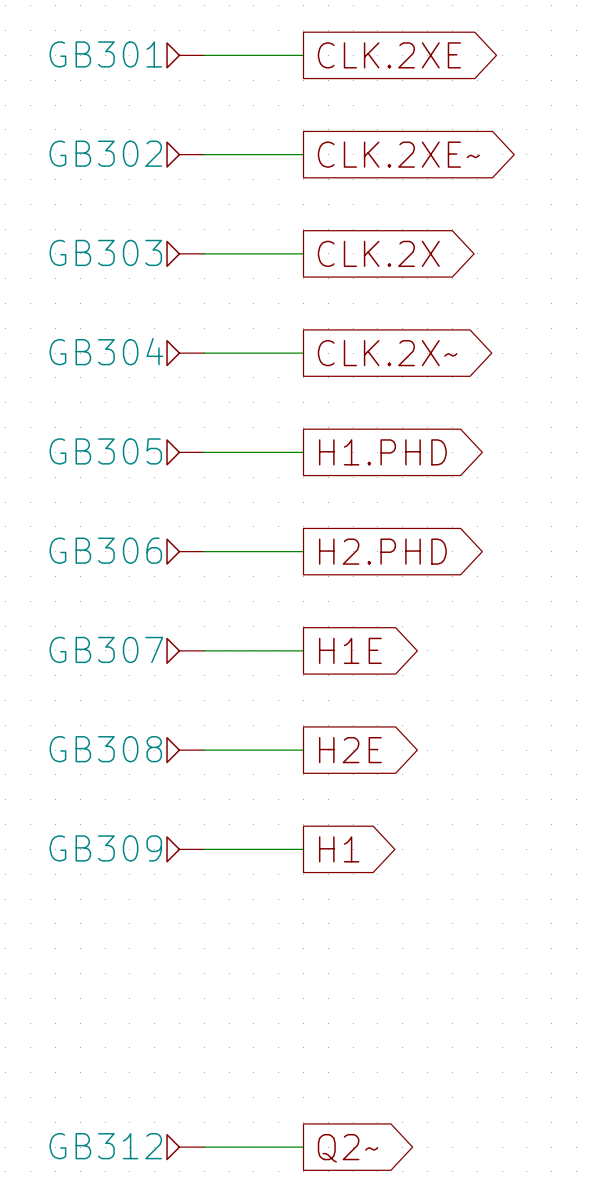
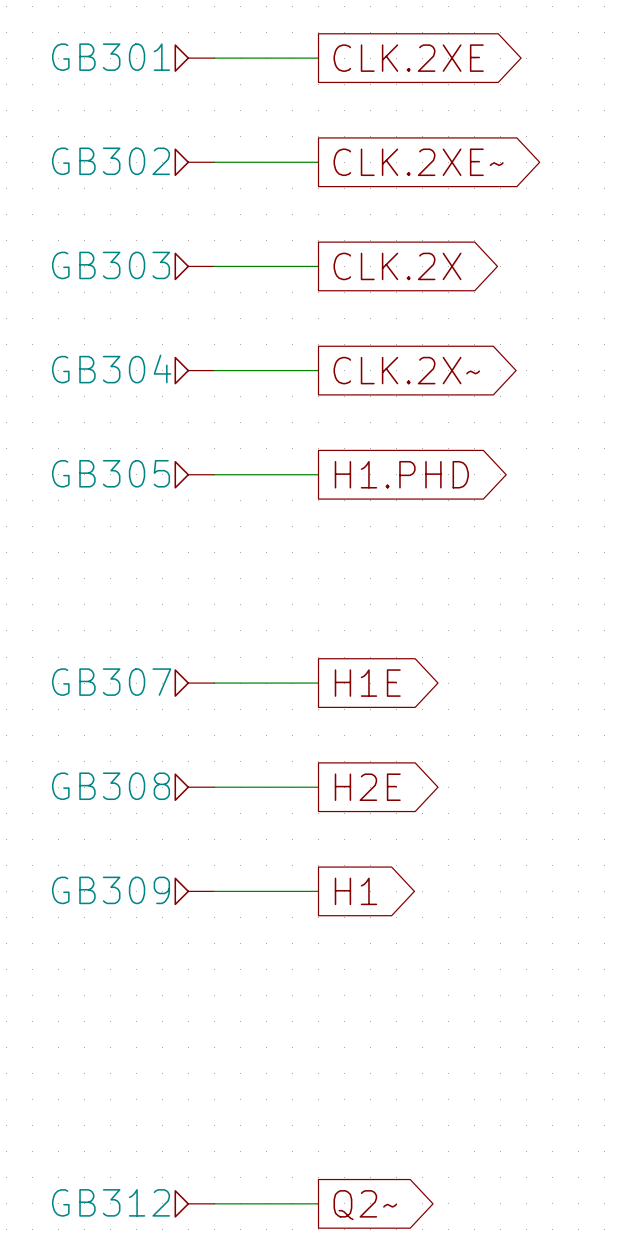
GB306: (185, 551) -> none
wire: (204, 551) (303, 551) -> none
global label: H2.PHD (382, 551) -> none

